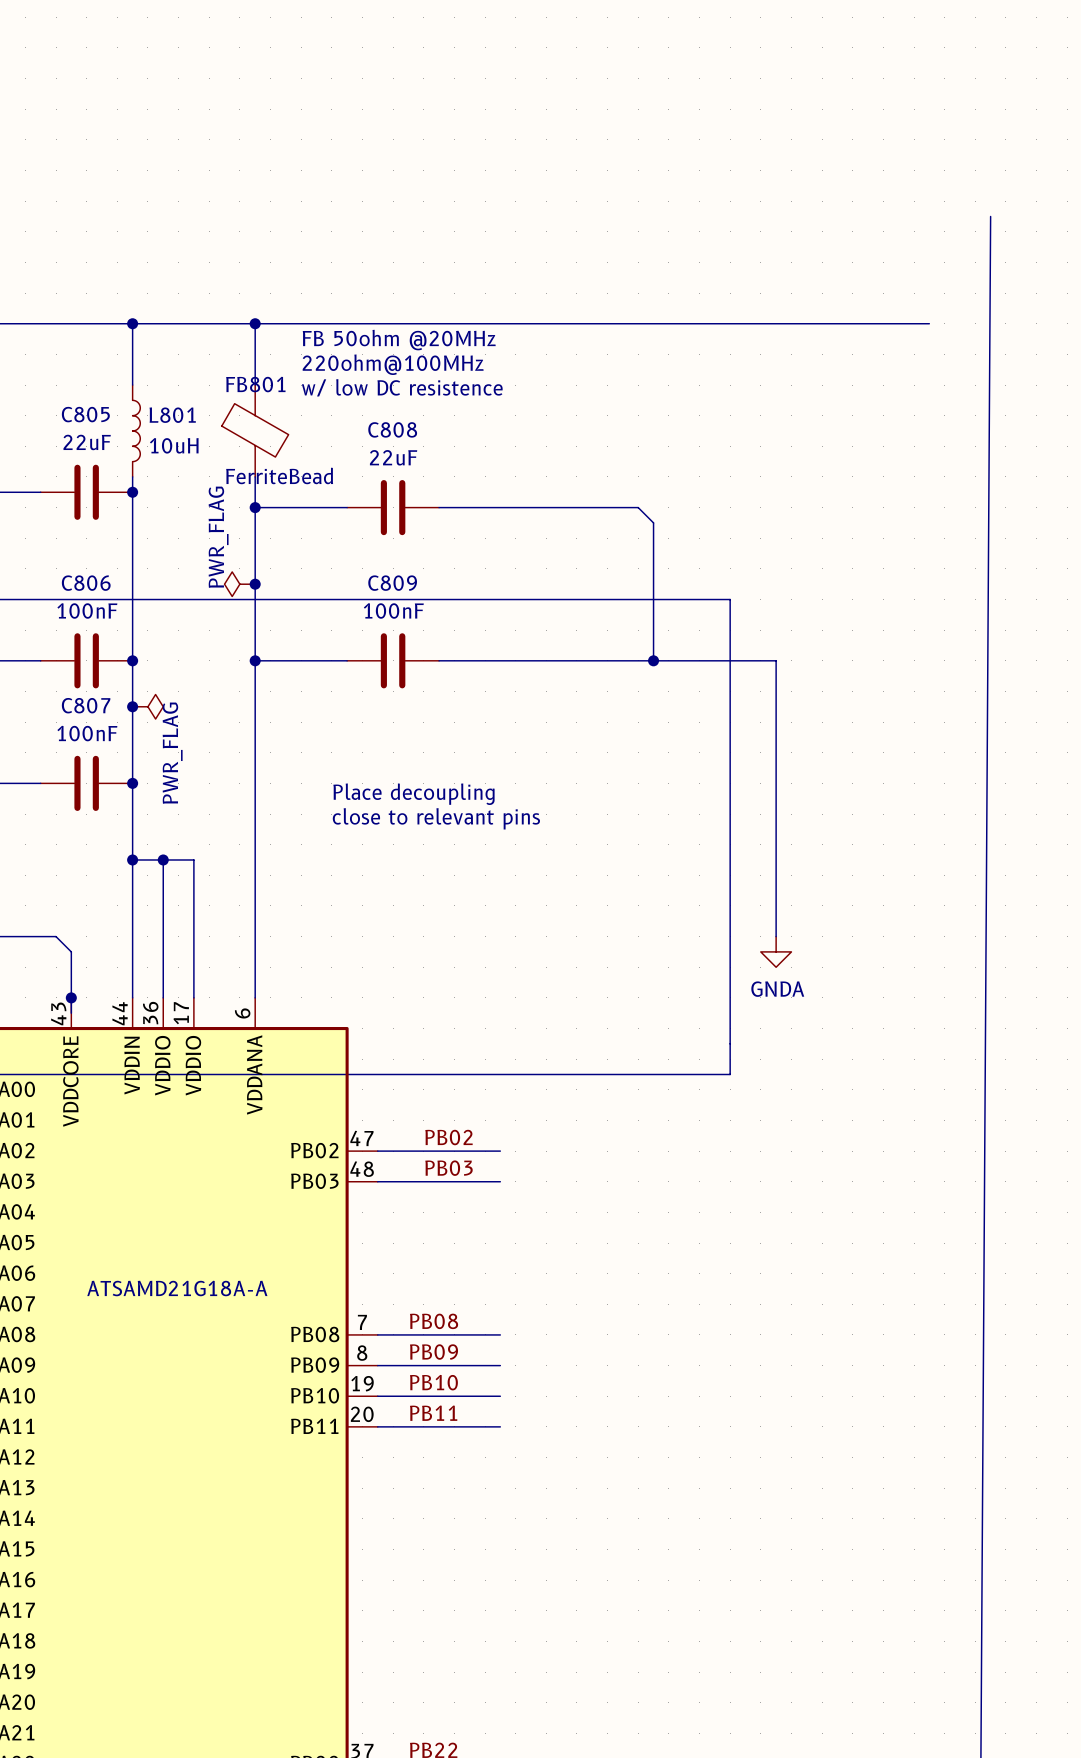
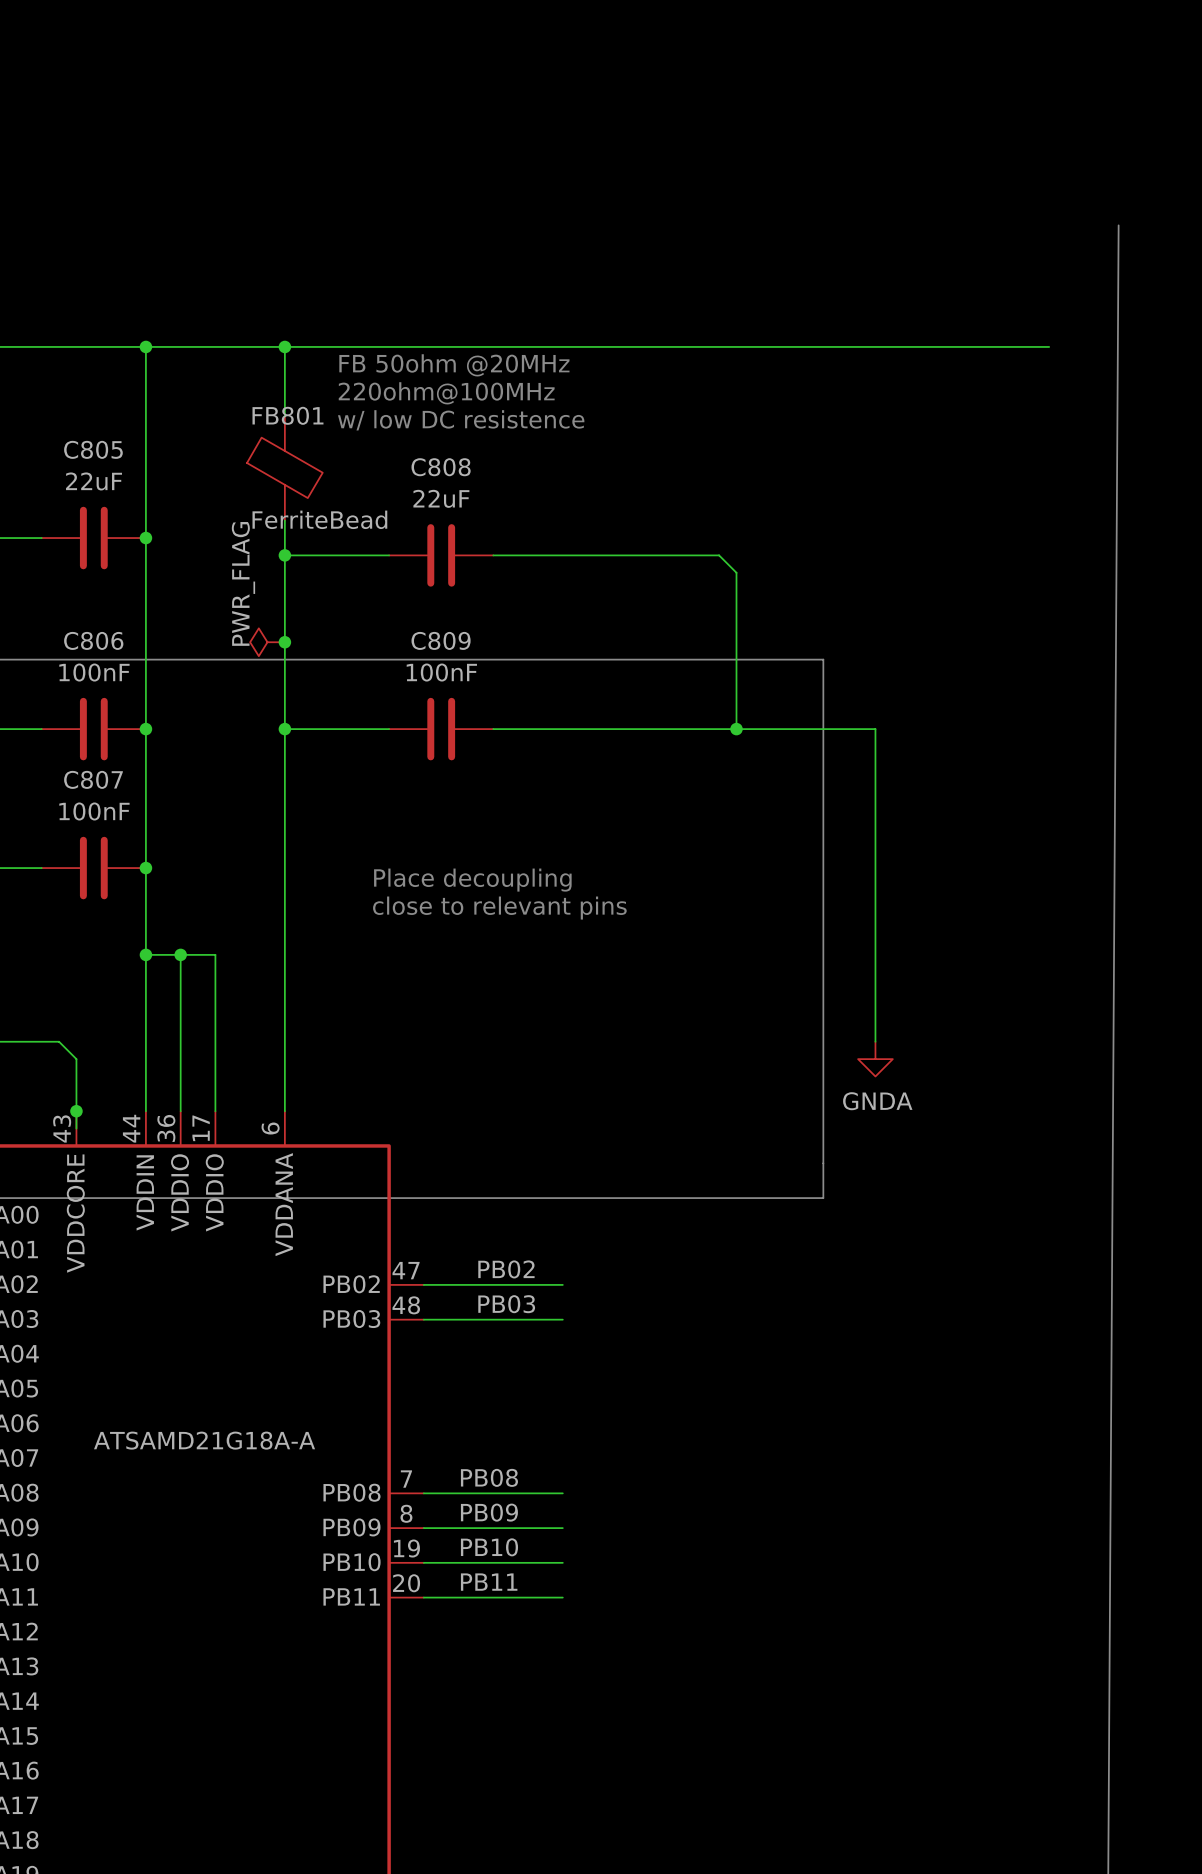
wire: none -> (145, 416) (145, 520)
L801: 10uH (136, 430) -> none
junction: (132, 706) -> none
power symbol: PWR_FLAG (147, 706) -> none

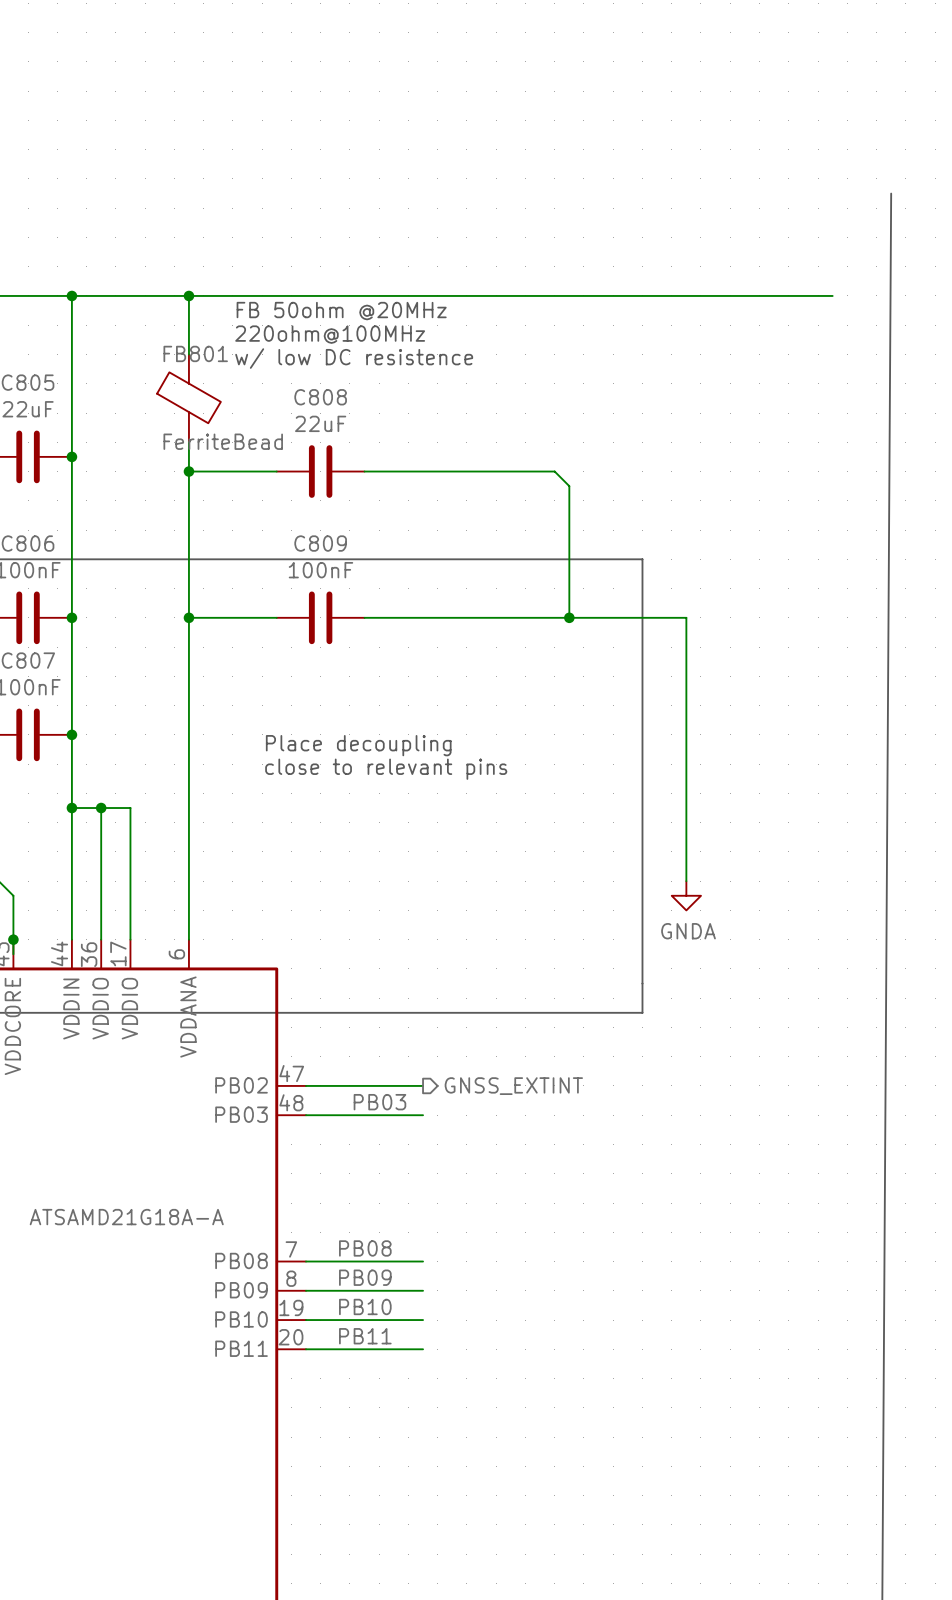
power symbol: PWR_FLAG (267, 642) -> none
junction: (284, 642) -> none
label: PB02 (506, 1269) -> none
hierarchical label: none -> GNSS_EXTINT (513, 1086)

